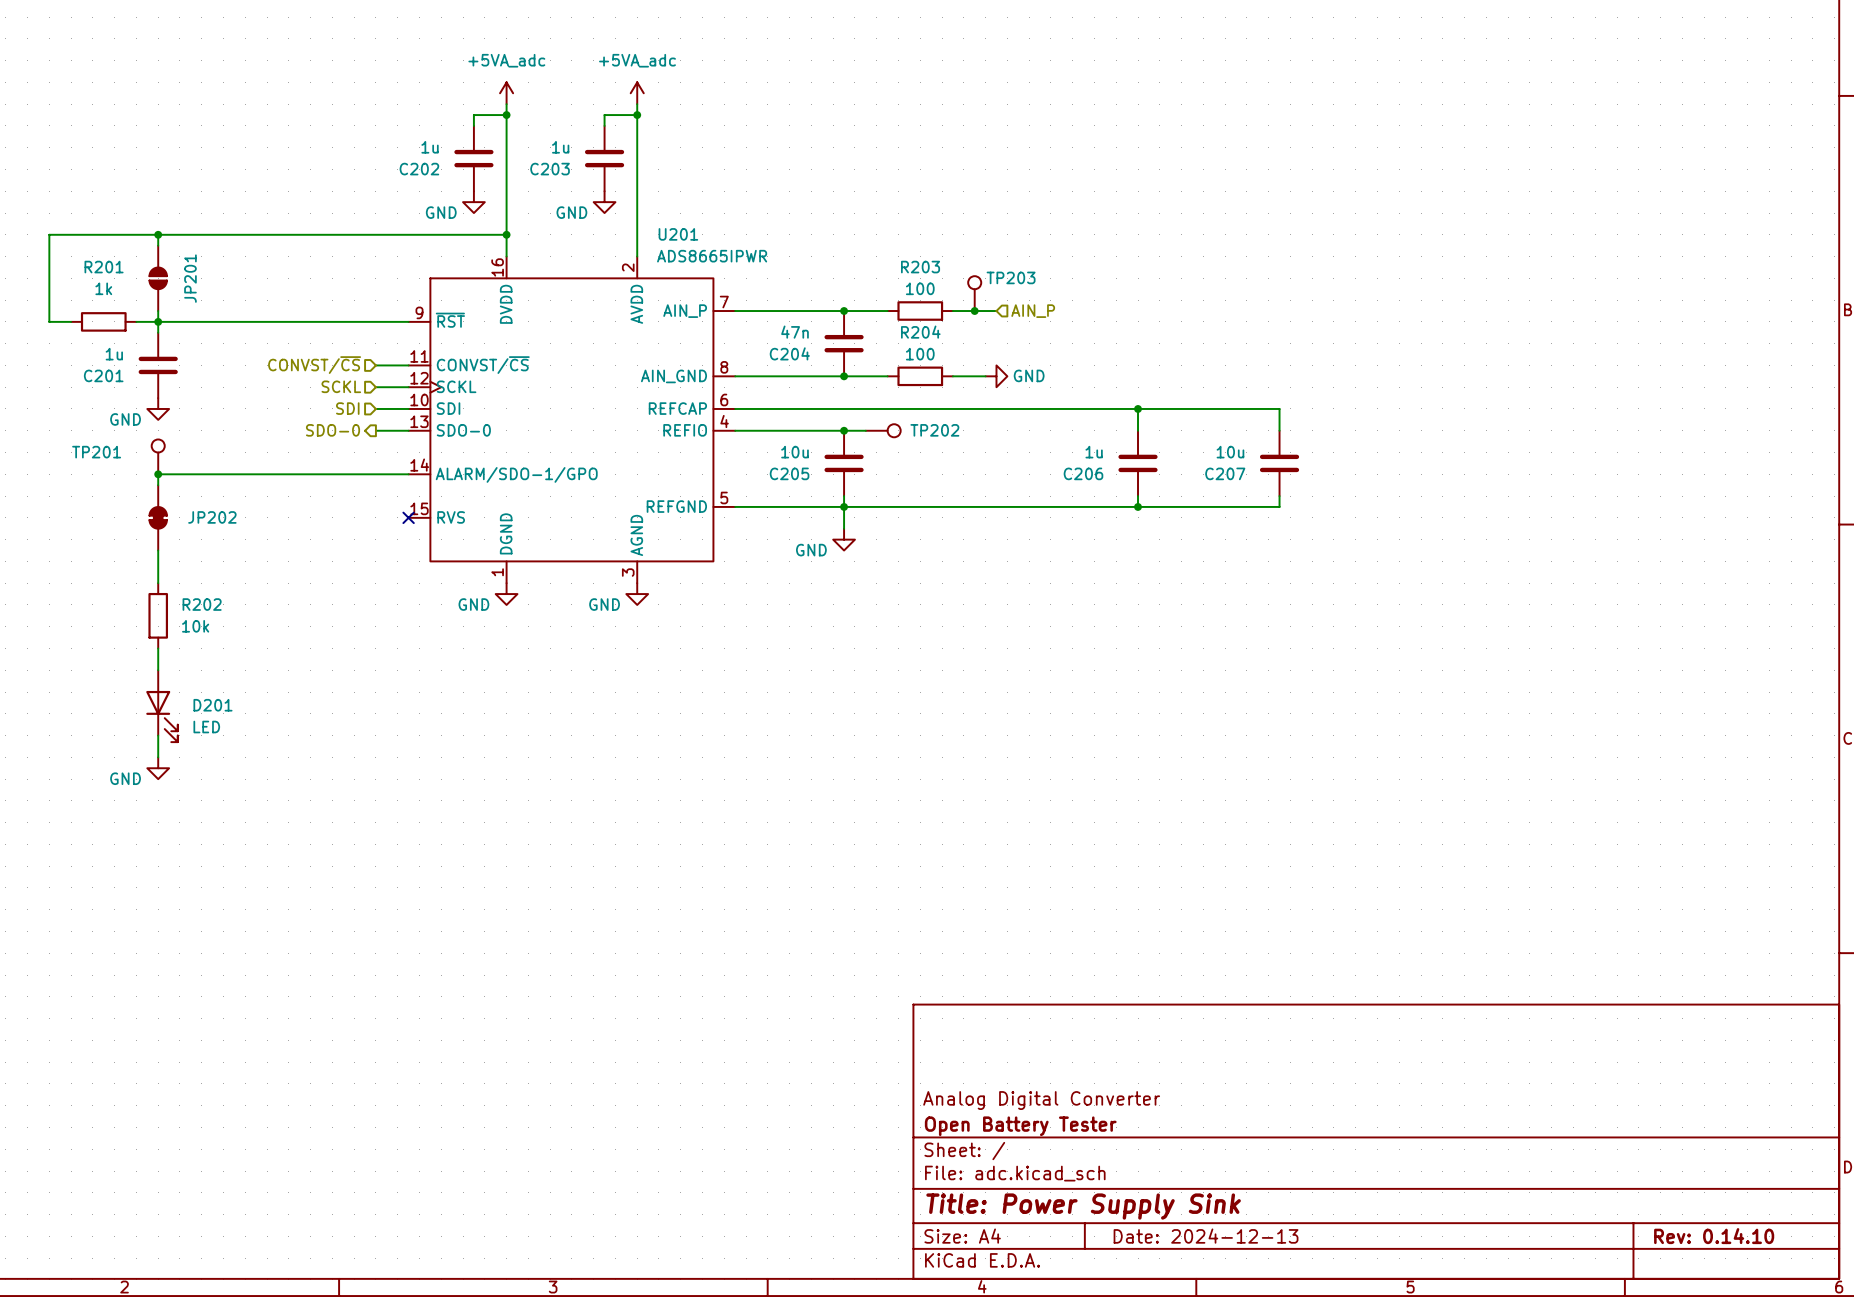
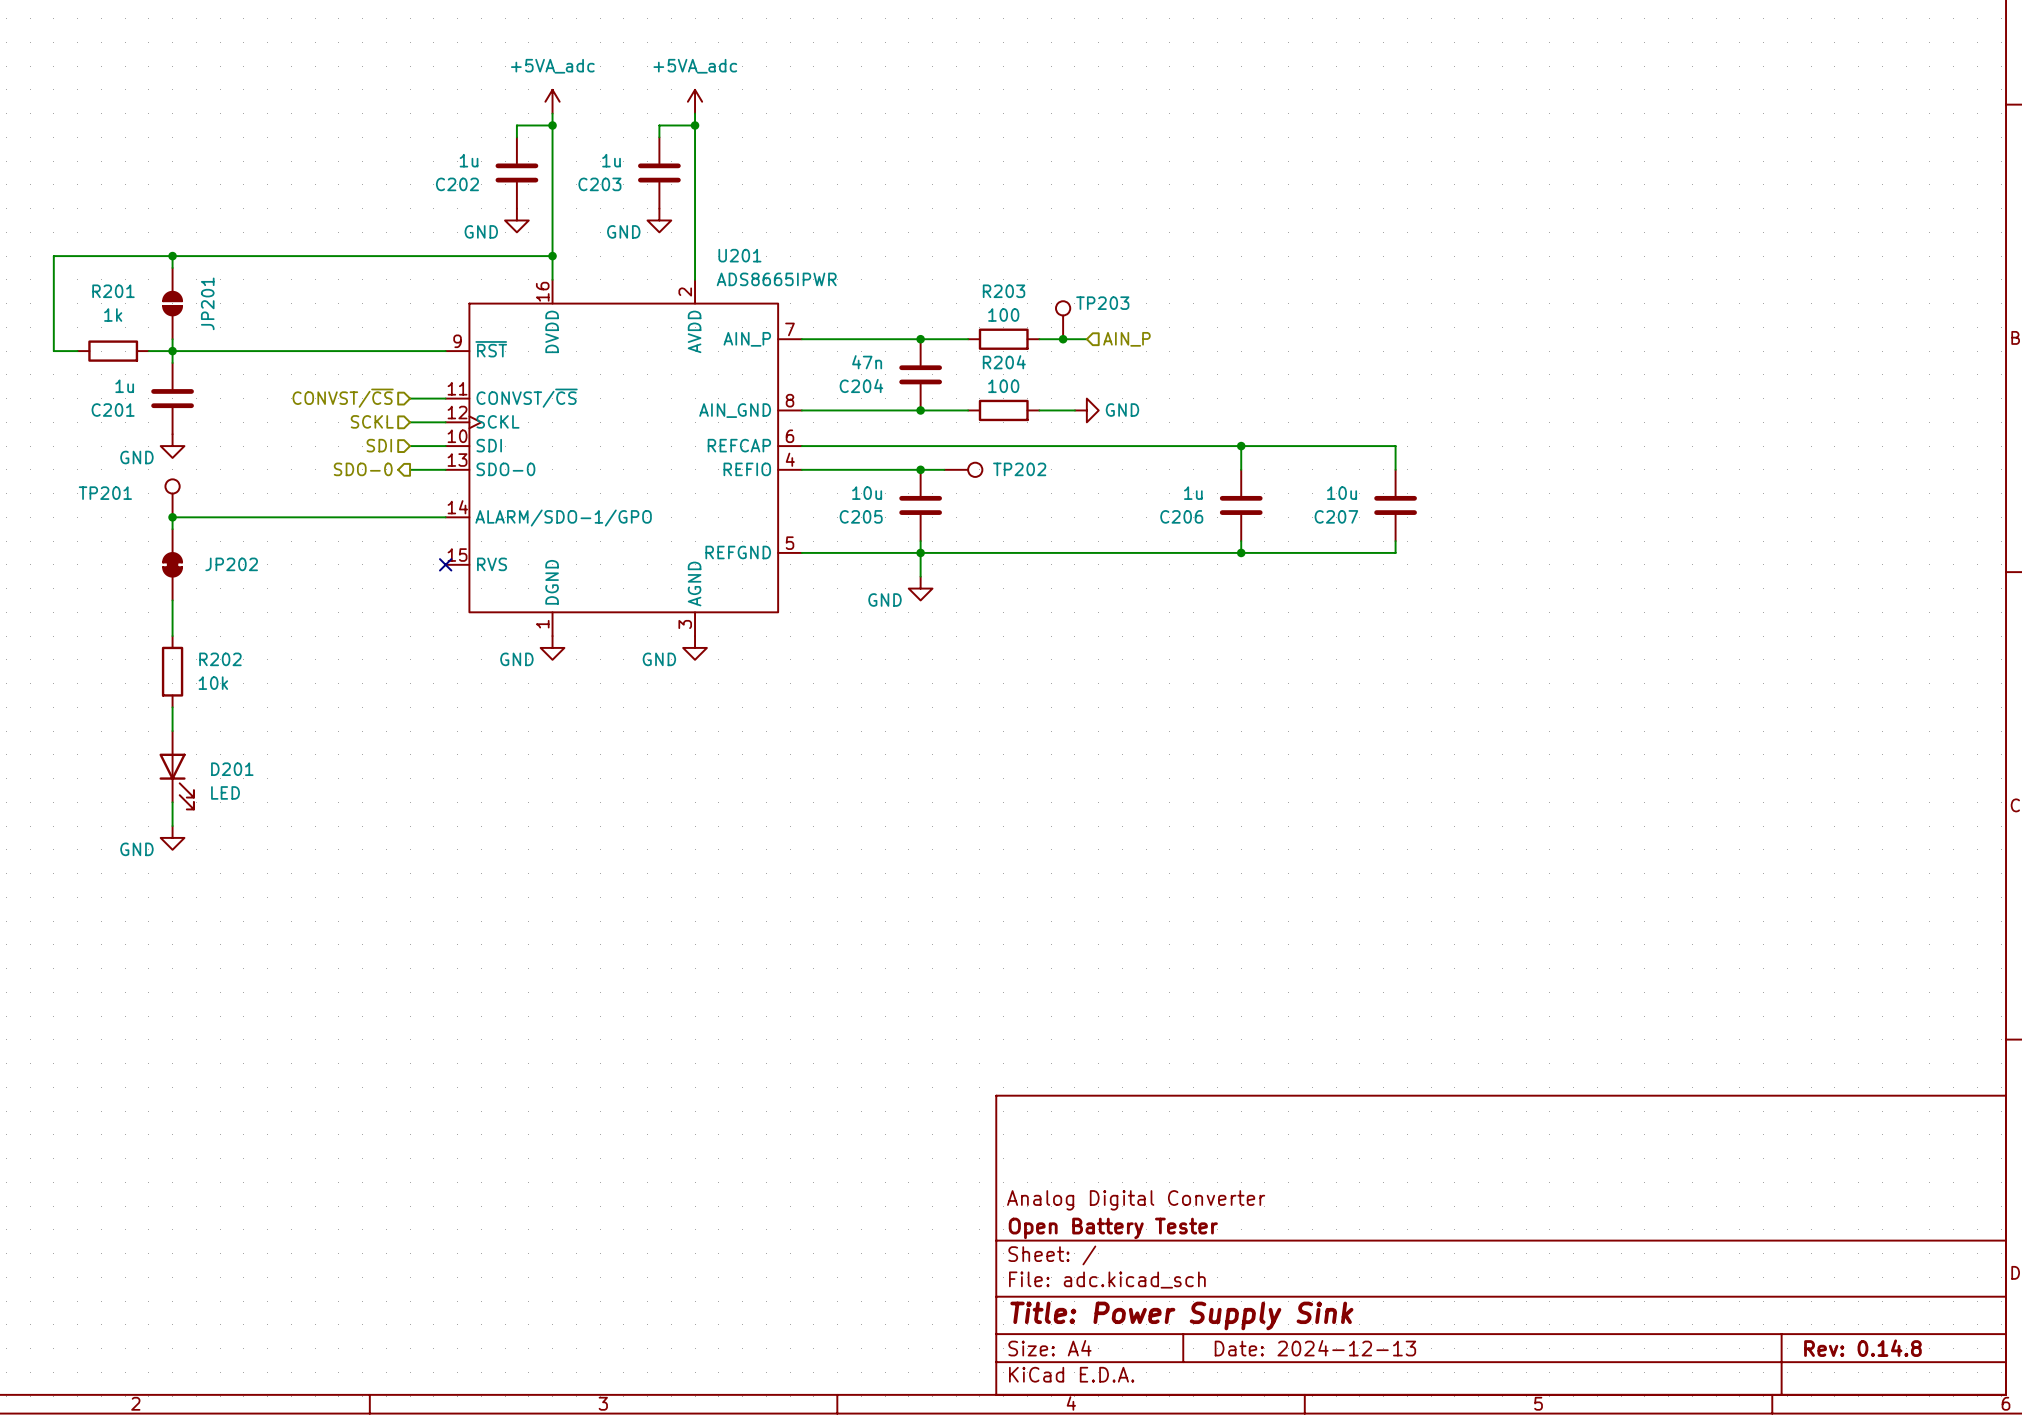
title block: Rev: 0.14.10 (1714, 1236) -> Rev: 0.14.8 (1862, 1348)

